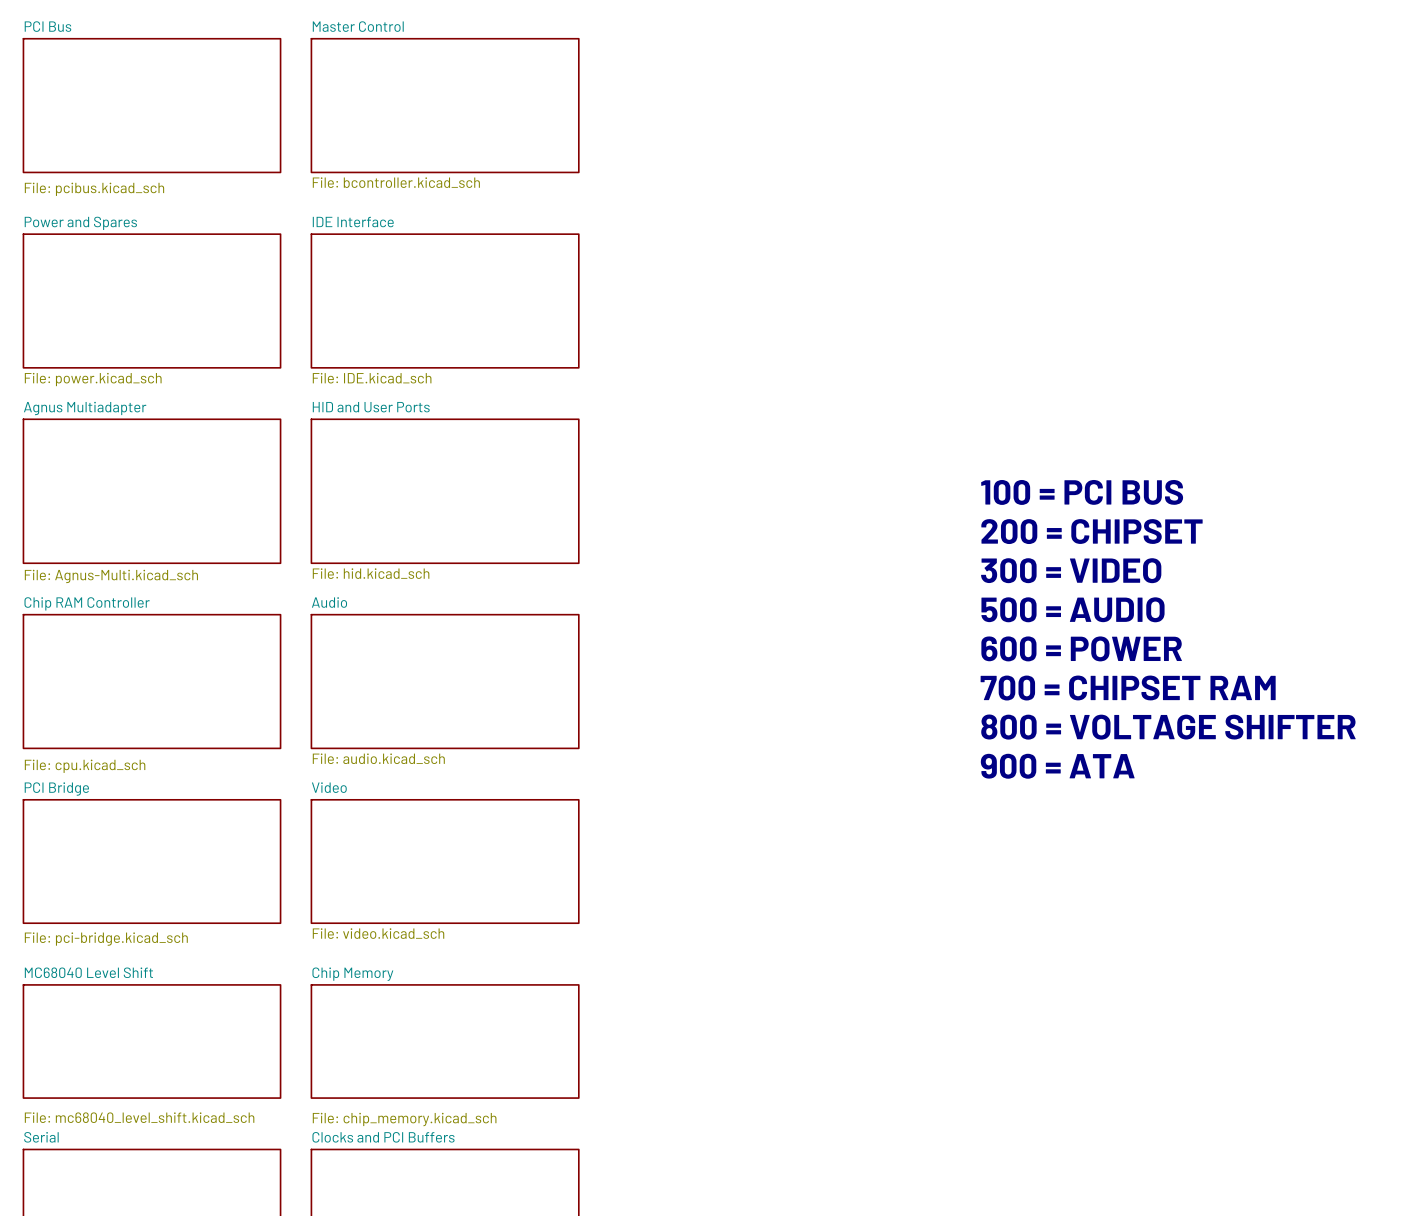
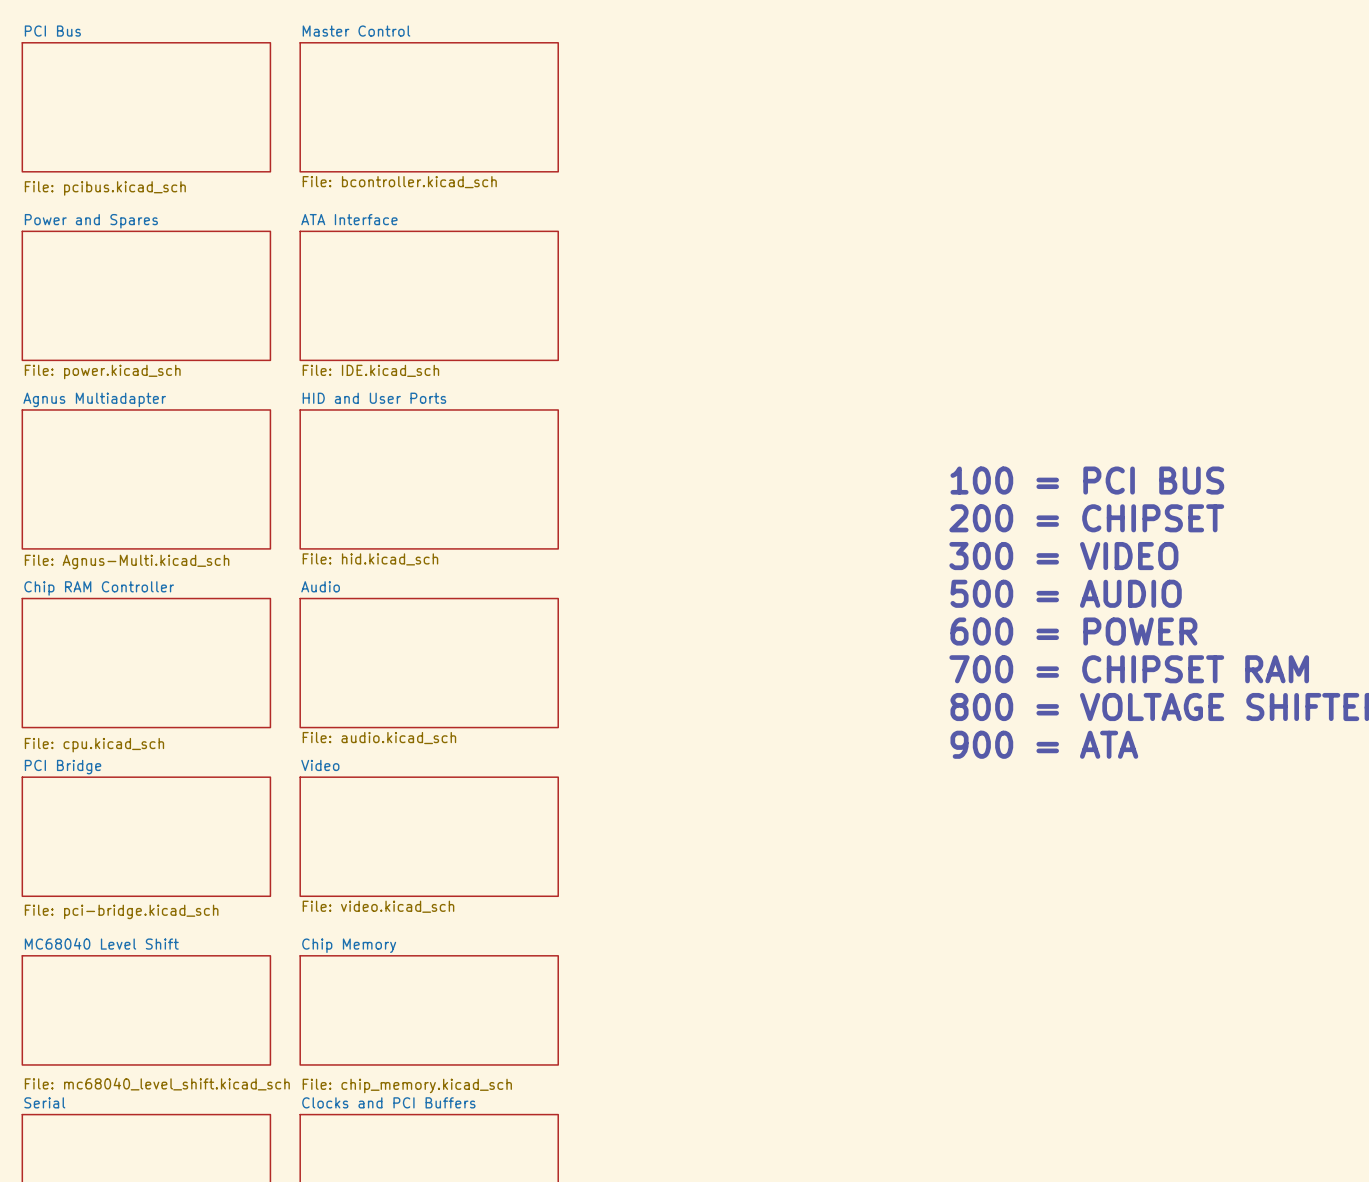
sheet IDE Interface name: IDE Interface (353, 222) -> ATA Interface (349, 219)

